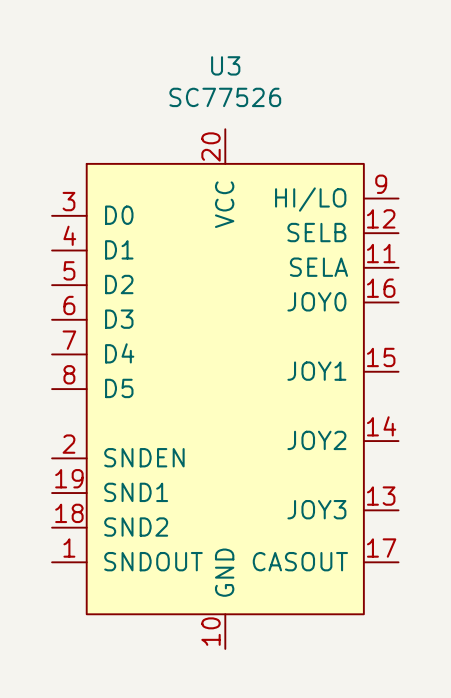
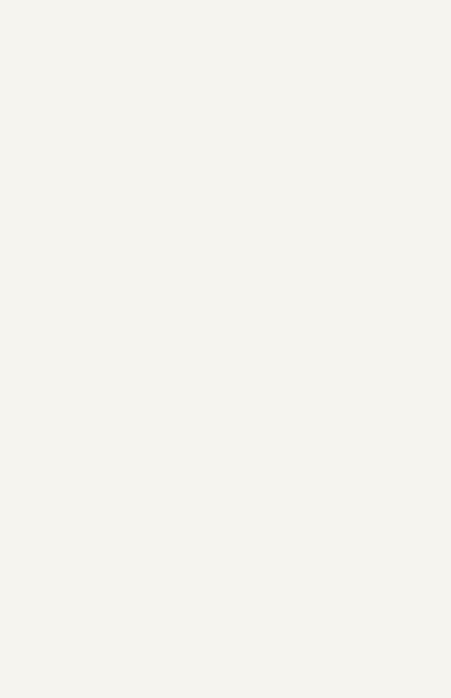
U3: SC77526 (225, 389) -> none

